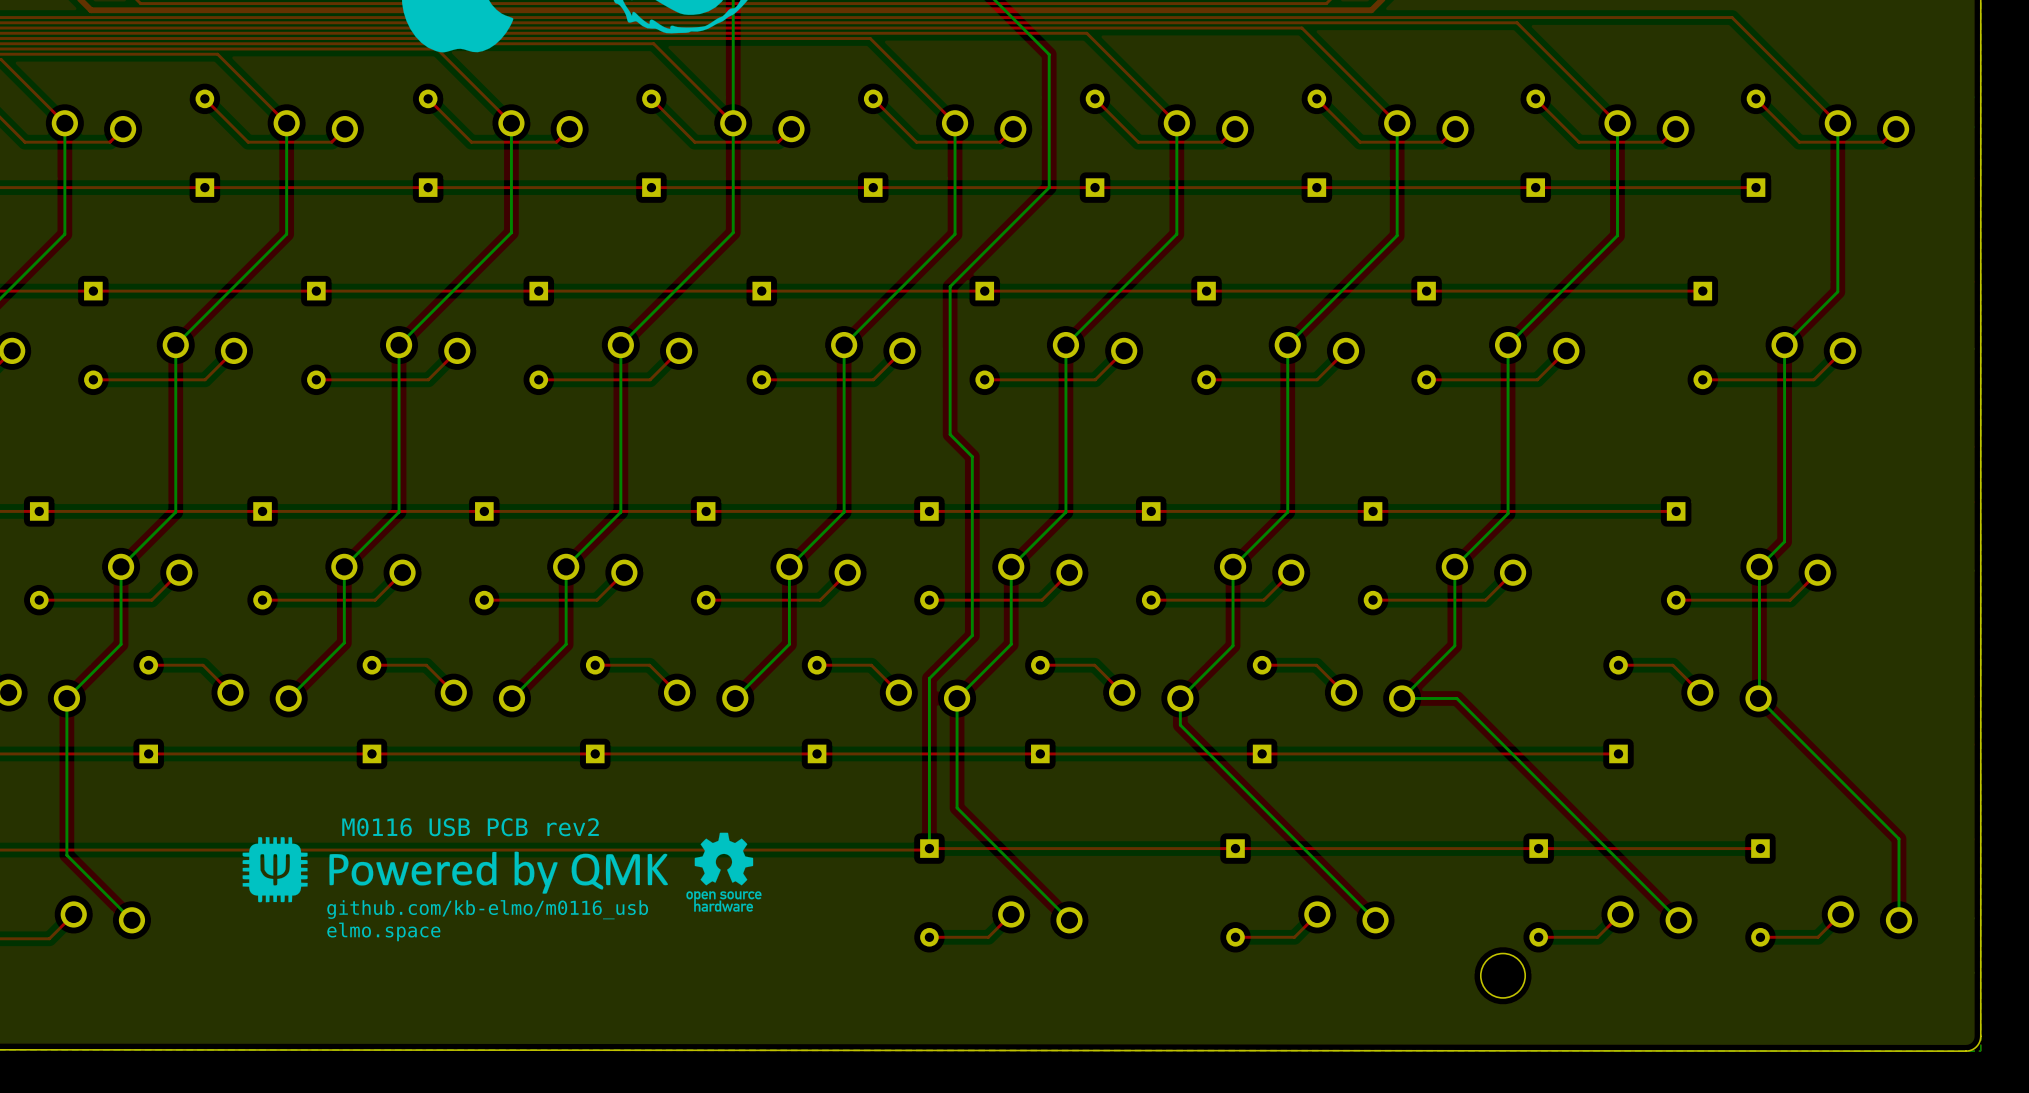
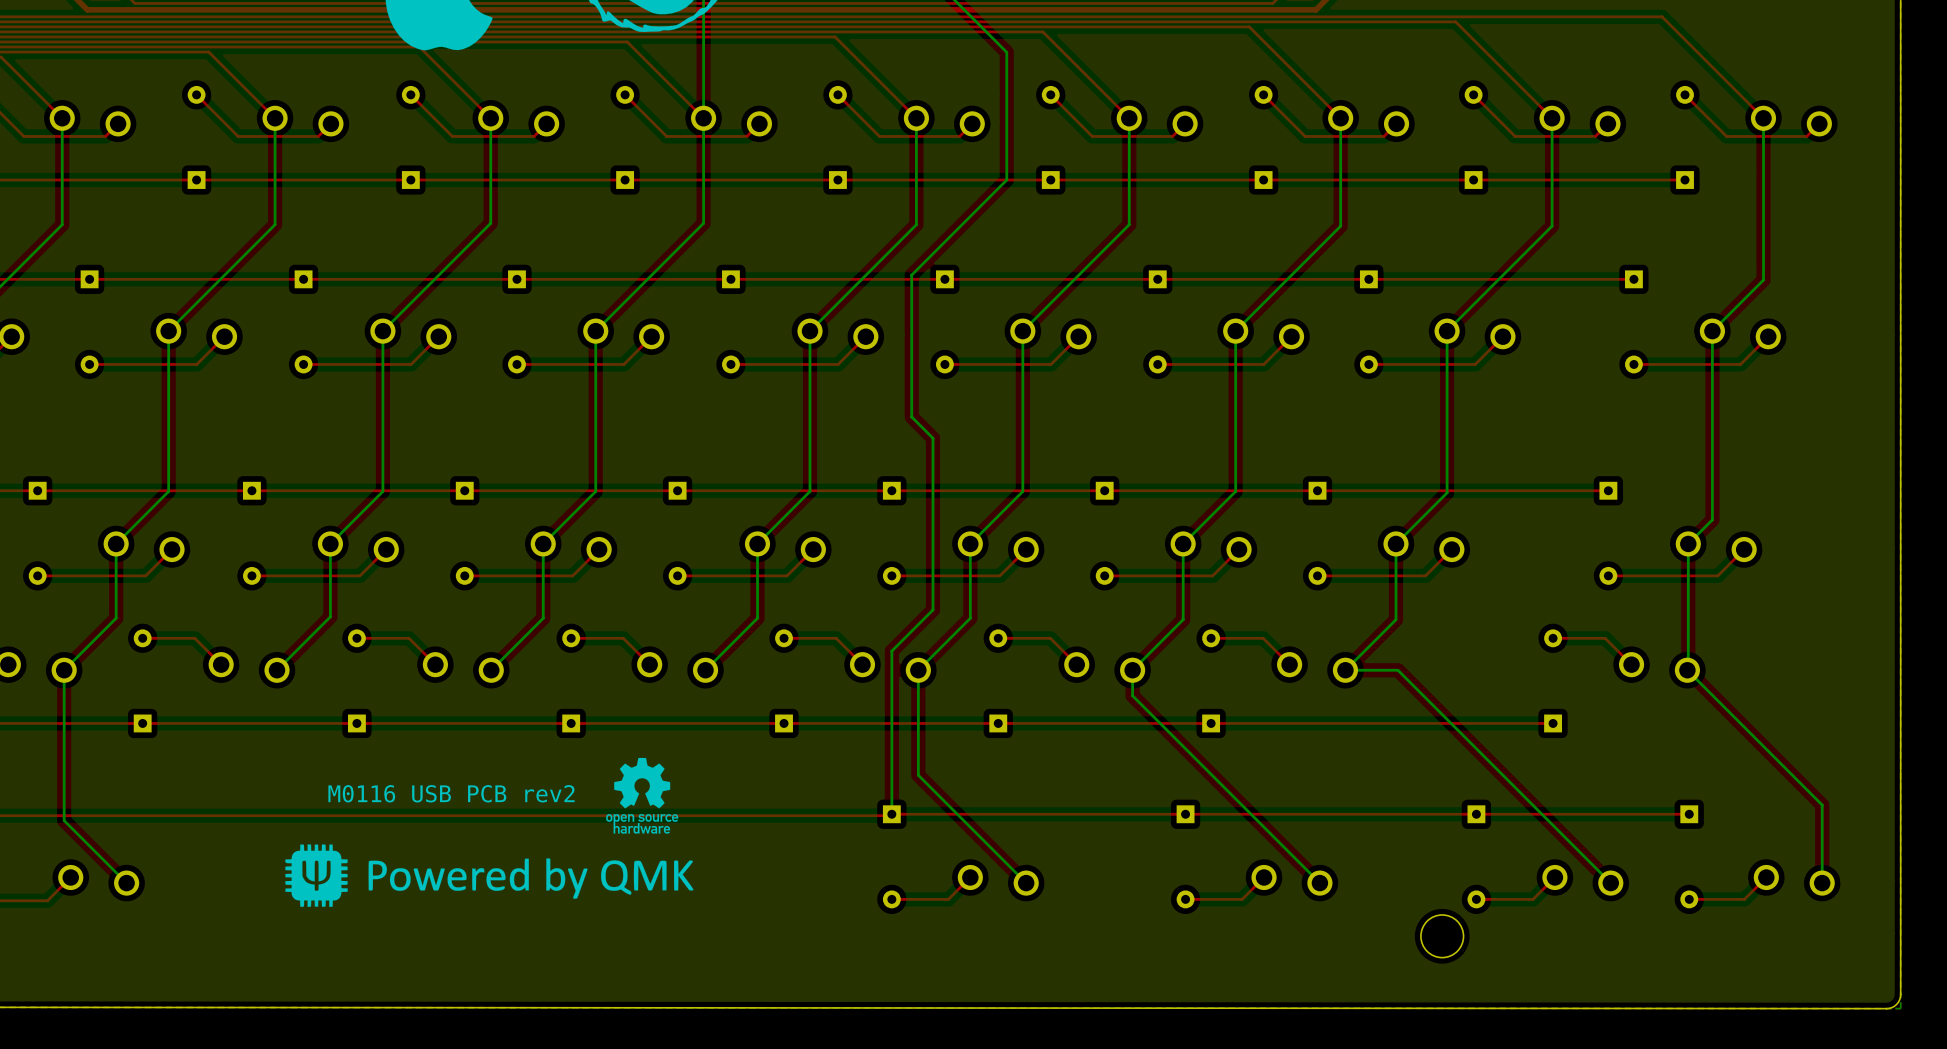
drawing position: (455, 869) -> (489, 875)
drawing position: (723, 872) -> (642, 795)
text: github.com/kb-elmo/m0116_usb (487, 909) -> none
text: elmo.space (383, 931) -> none

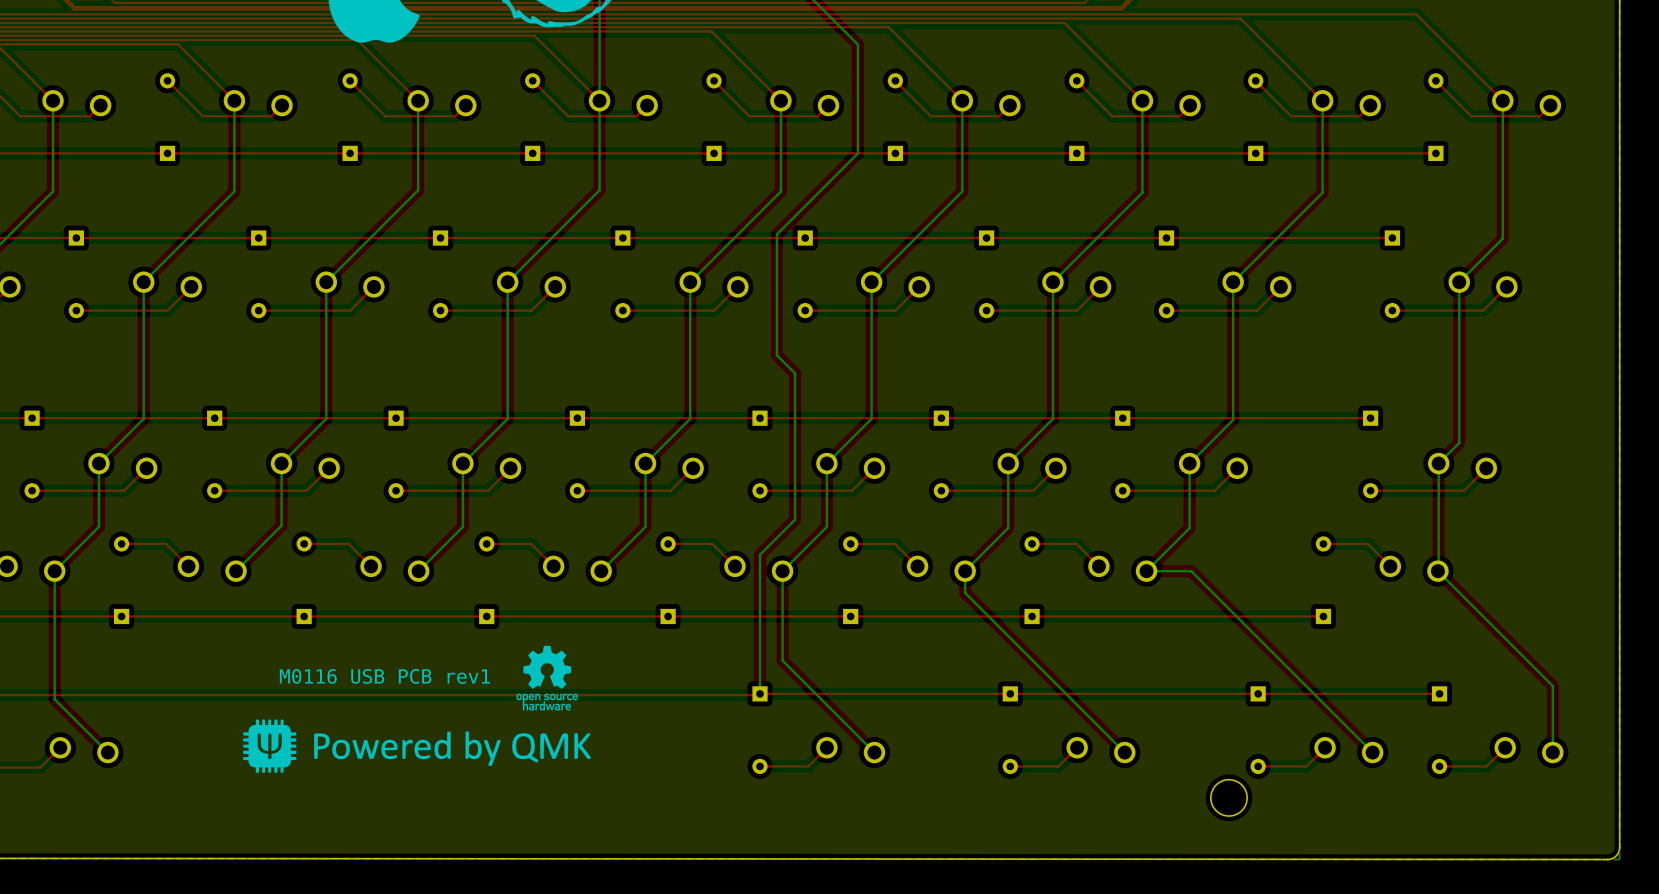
text: M0116 USB PCB rev2 (451, 793) -> M0116 USB PCB rev1 (384, 676)

